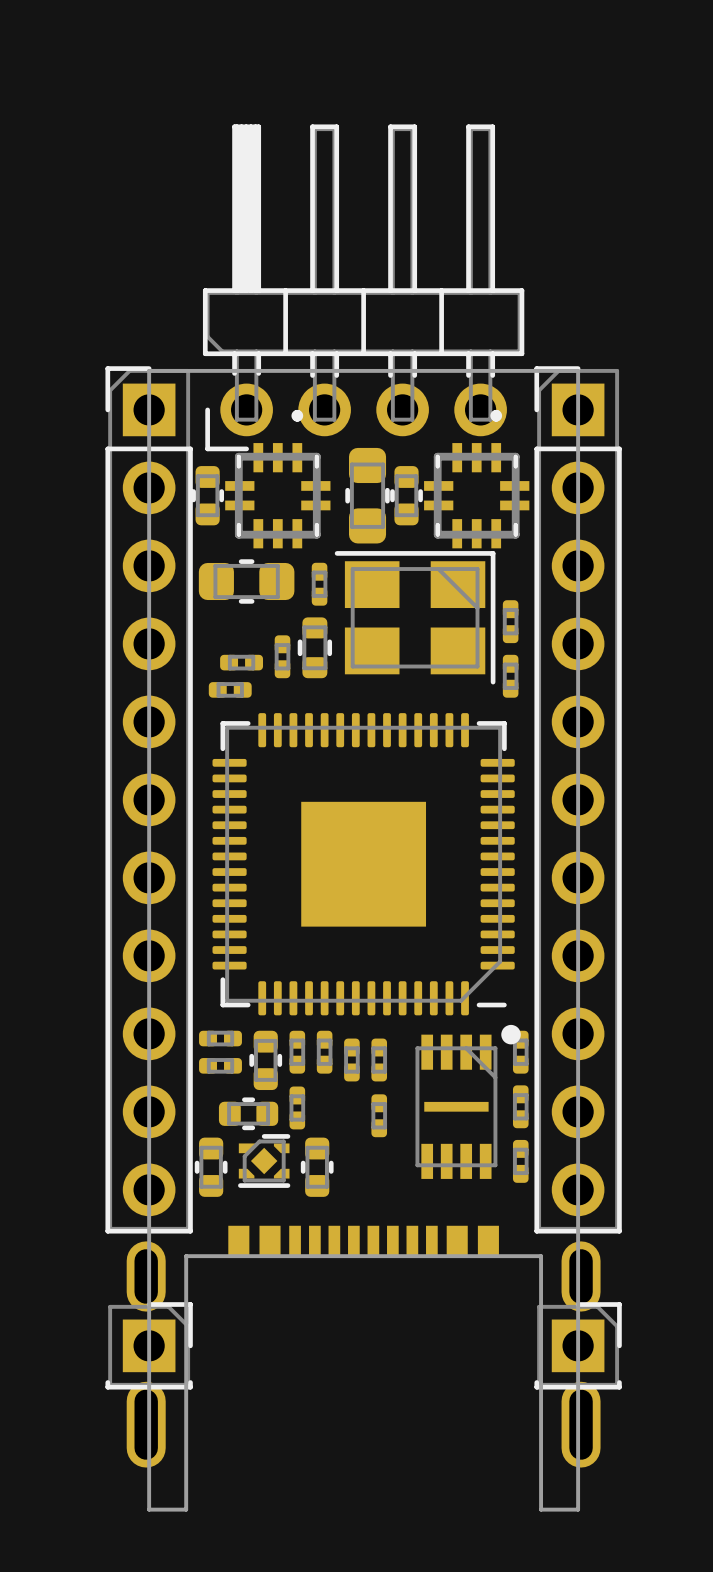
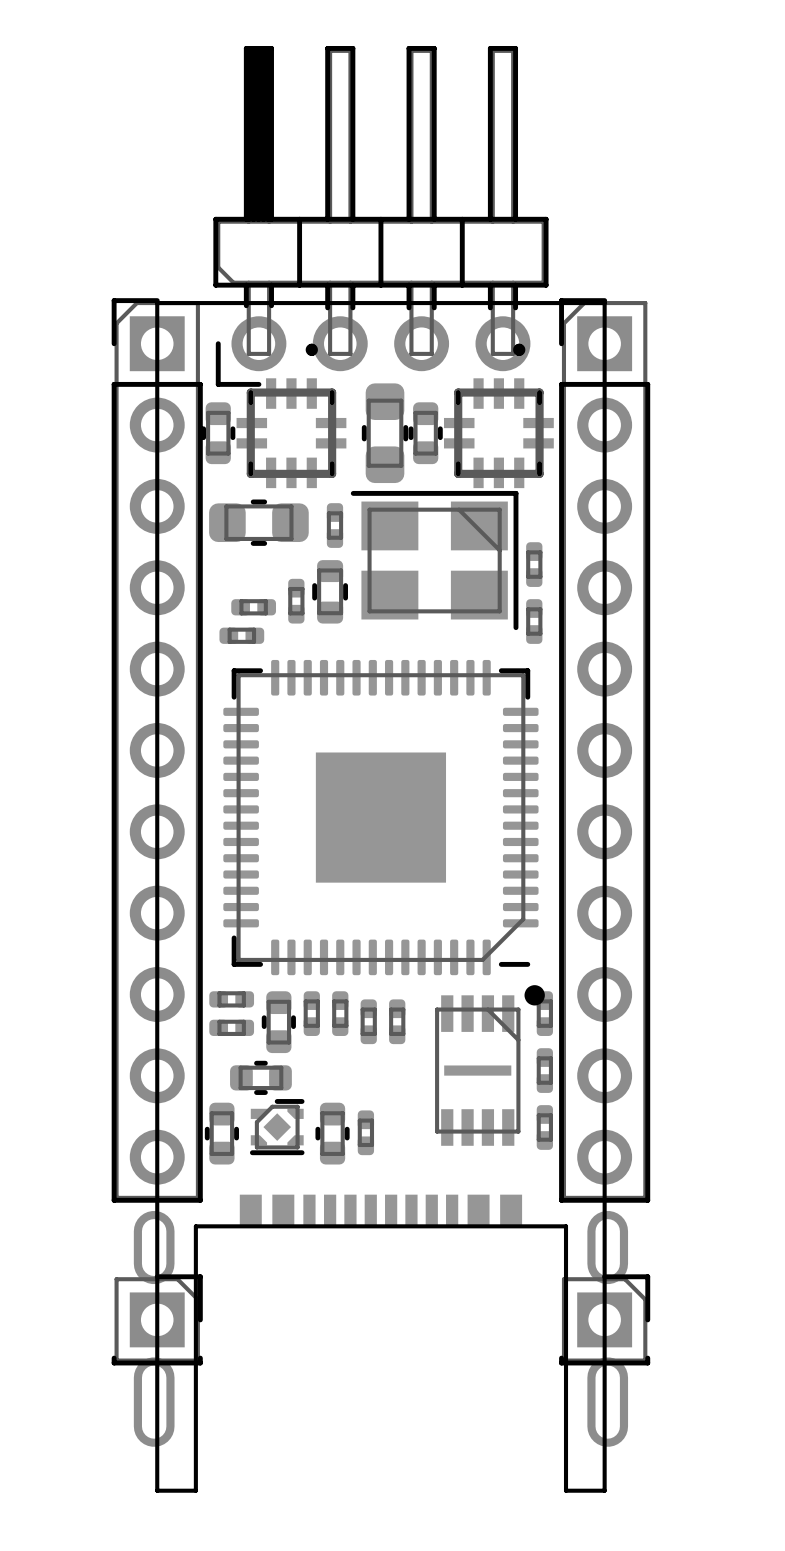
part: (297, 1107) -> none
part: (379, 1115) -> none
part: none -> (365, 1132)

